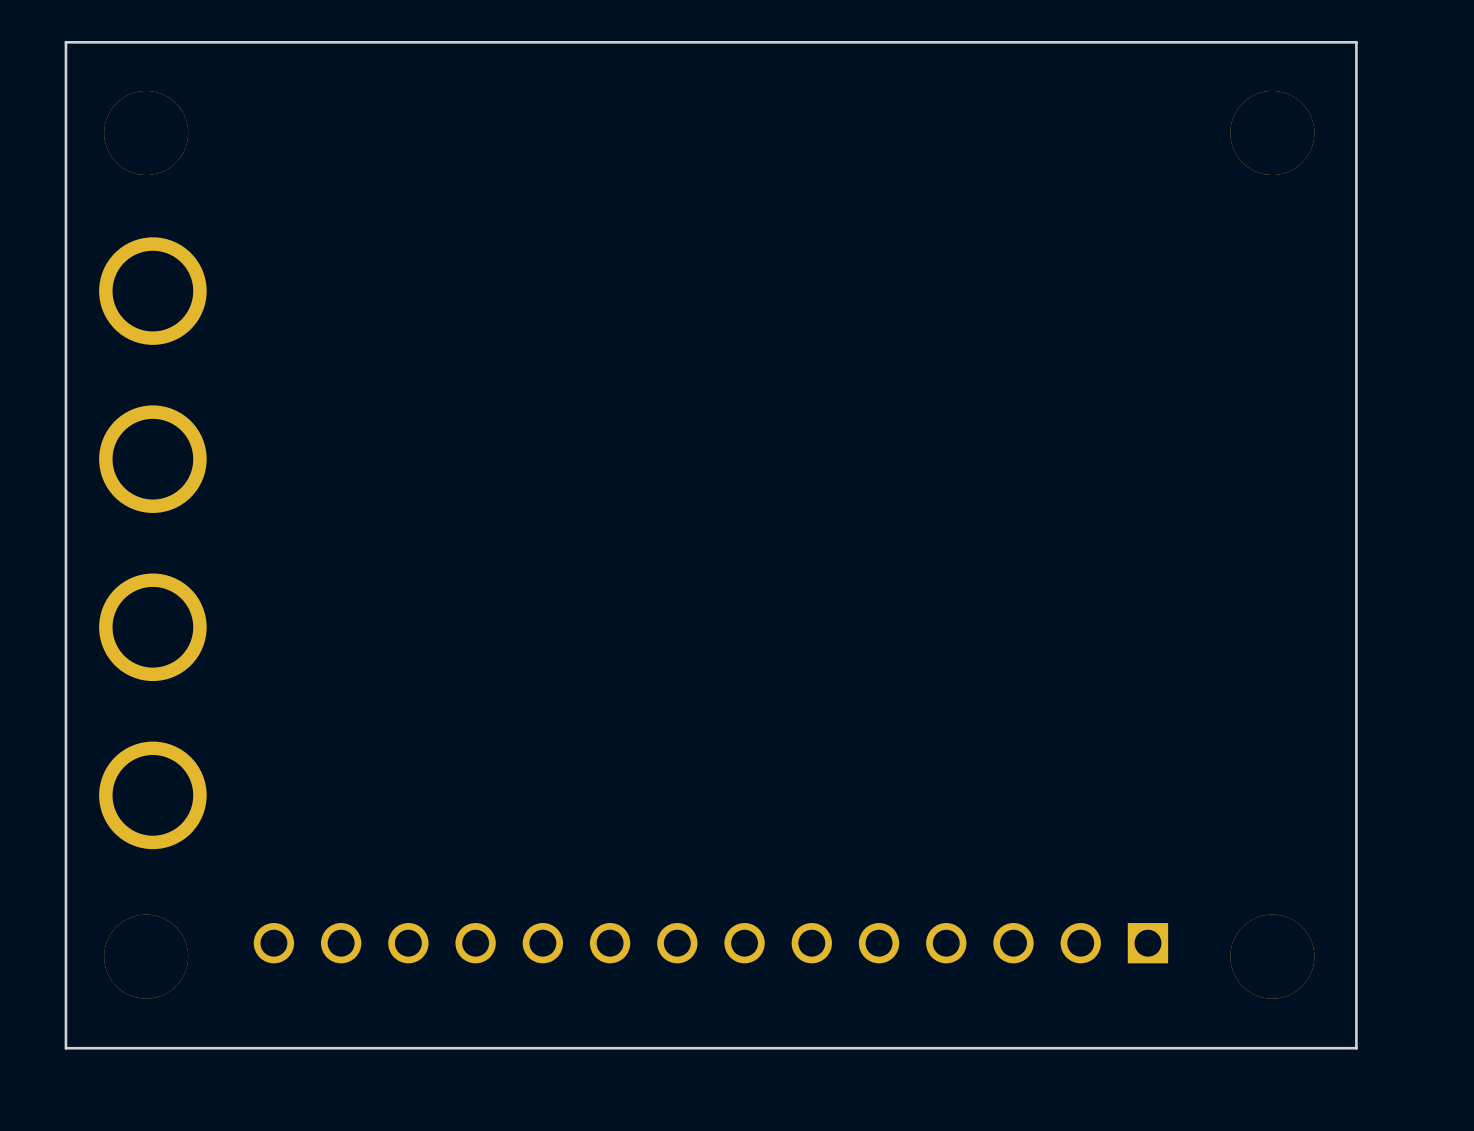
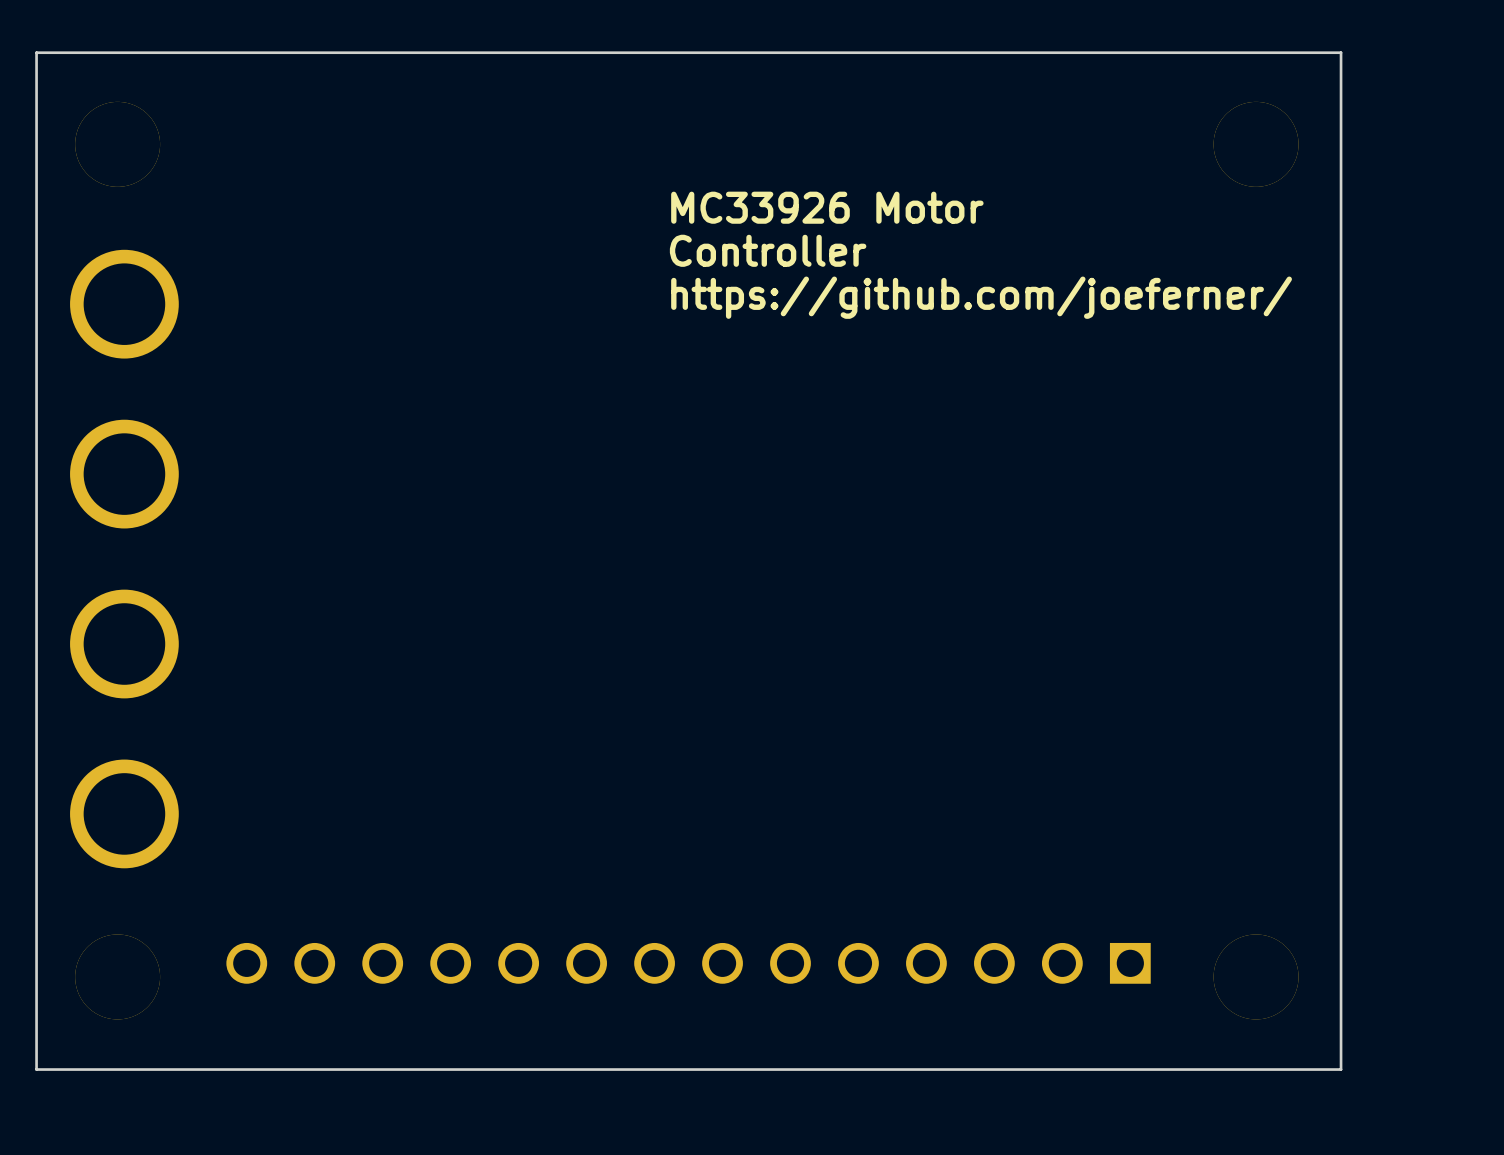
text: none -> MC33926 Motor (827, 207)
text: none -> Controller (768, 250)
text: none -> https://github.com/joeferner/ (981, 297)

